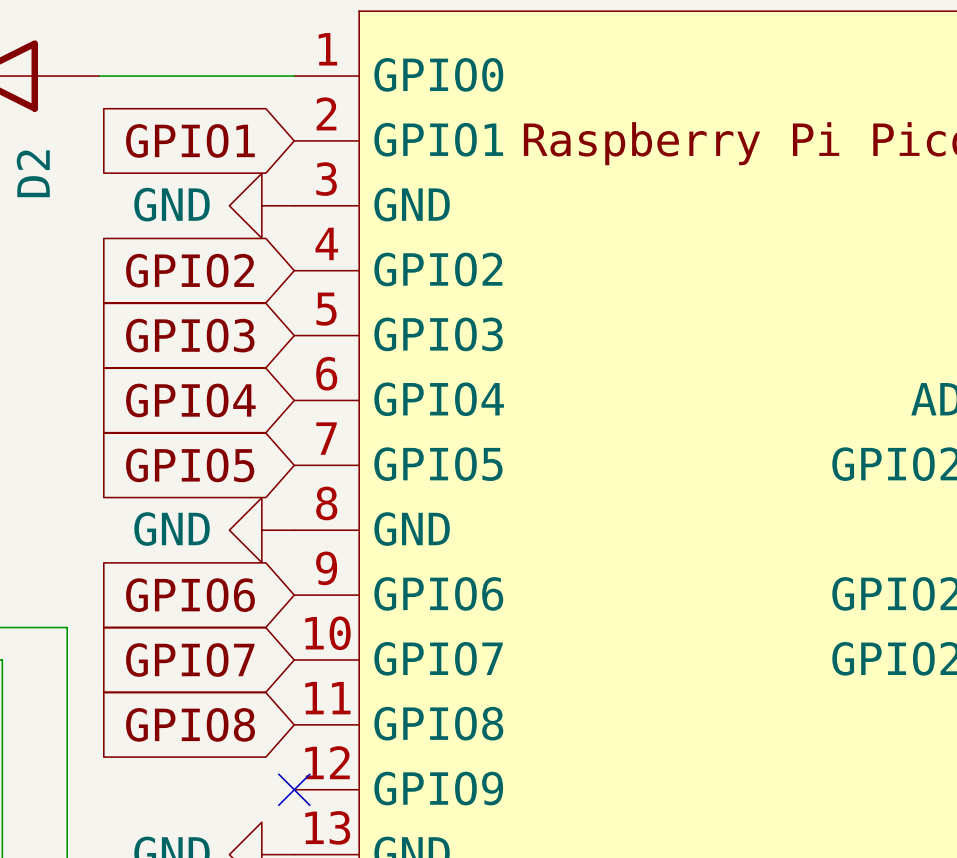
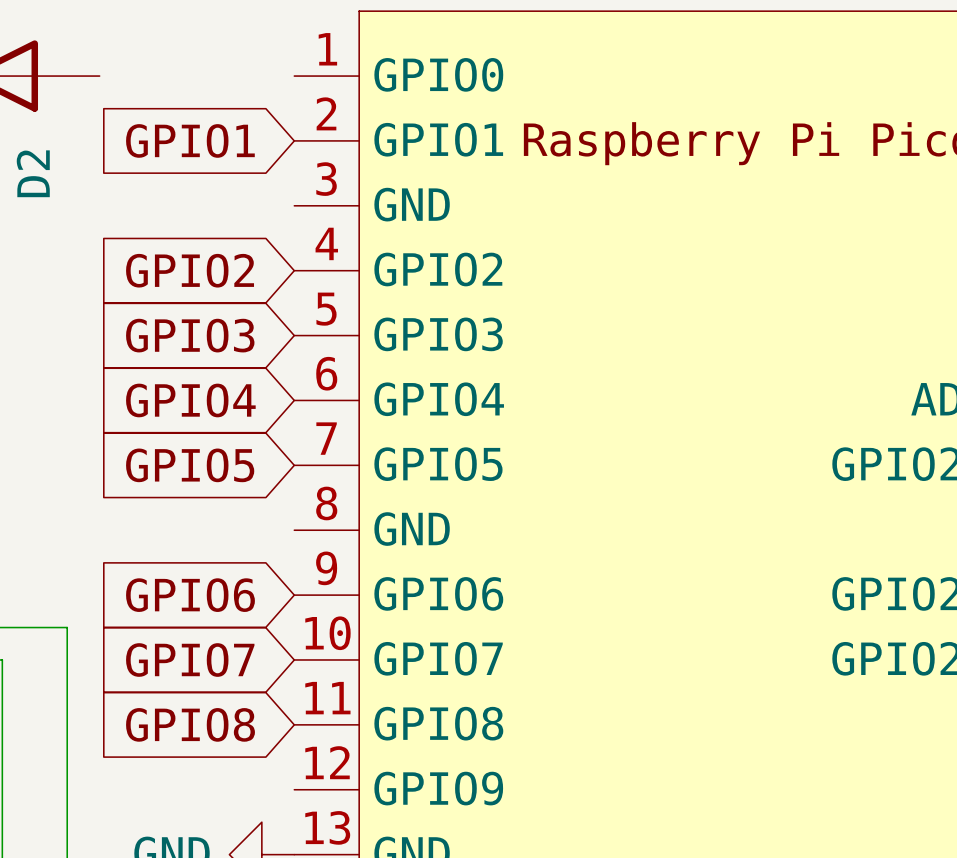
wire: (99, 76) (294, 76) -> none
power symbol: GND (261, 205) -> none
power symbol: GND (261, 530) -> none
no-connect mark: (294, 789) -> none

